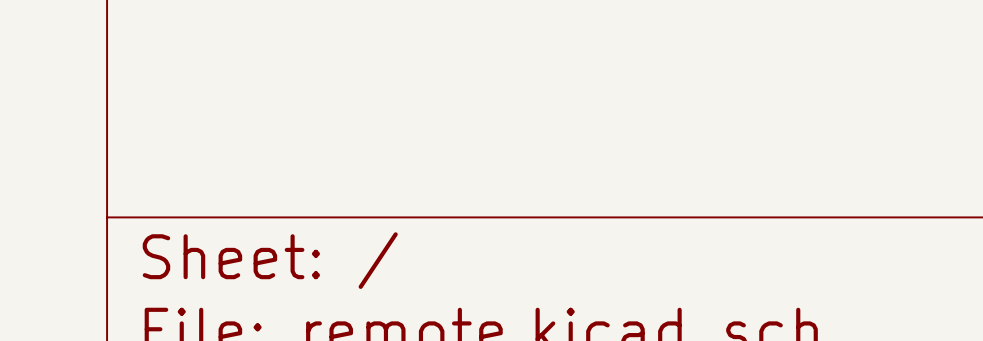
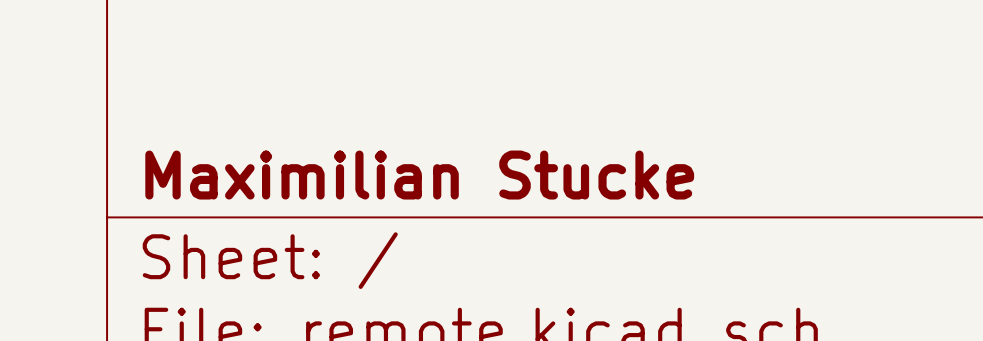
title block: none -> Maximilian Stucke (419, 175)

